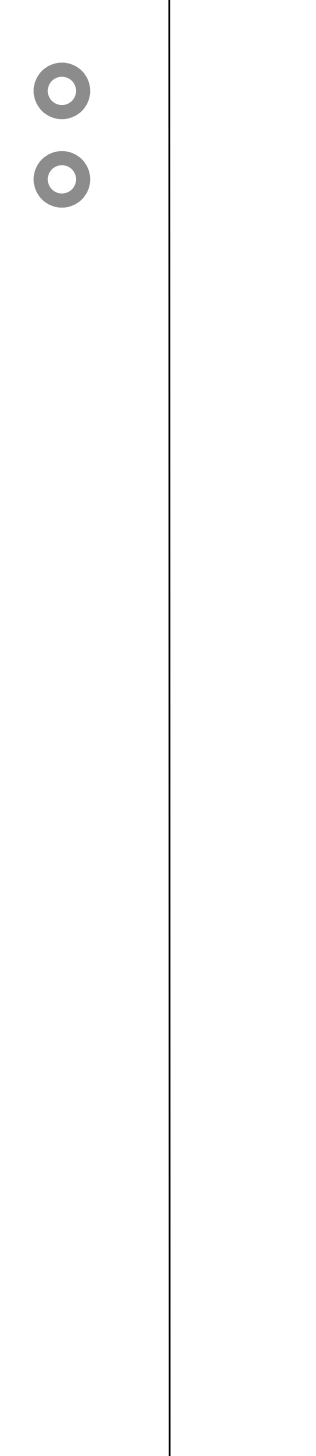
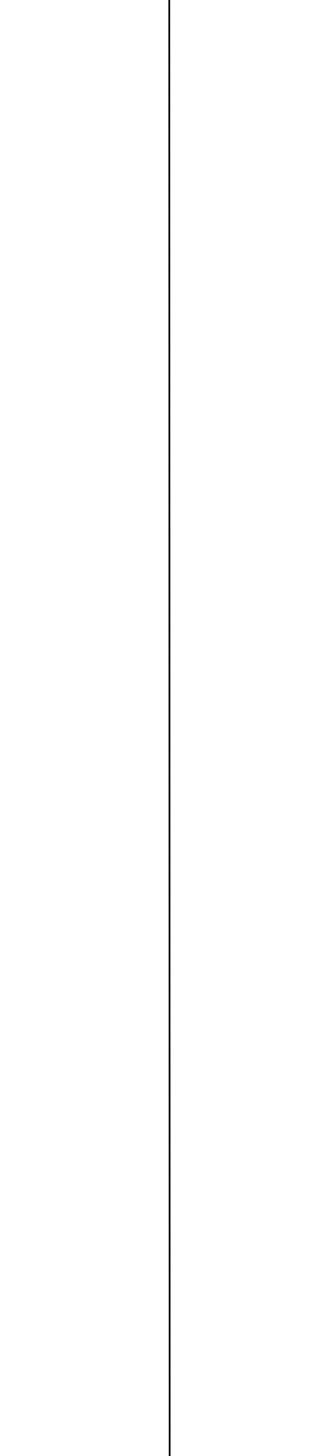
part: (61, 135) -> none

